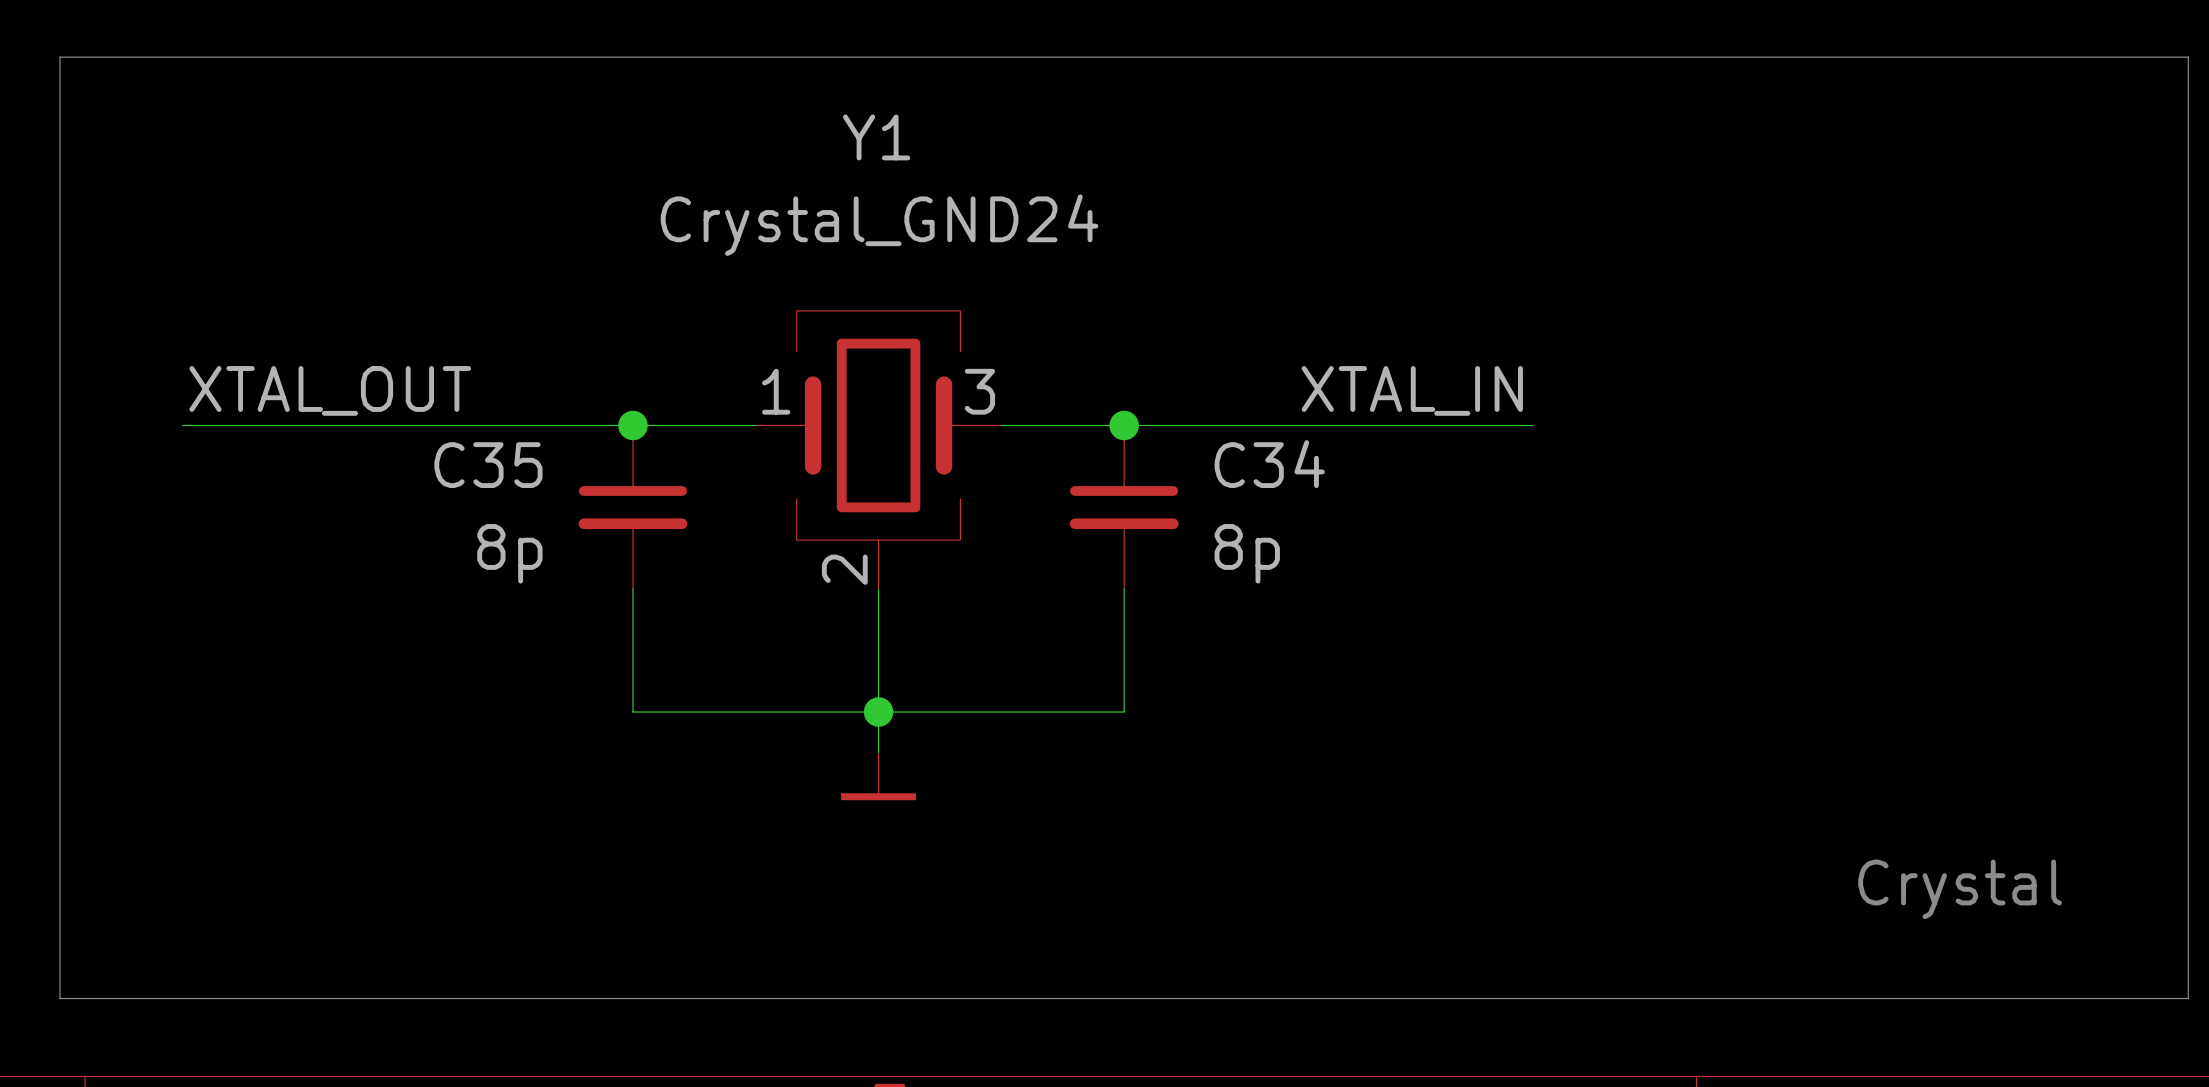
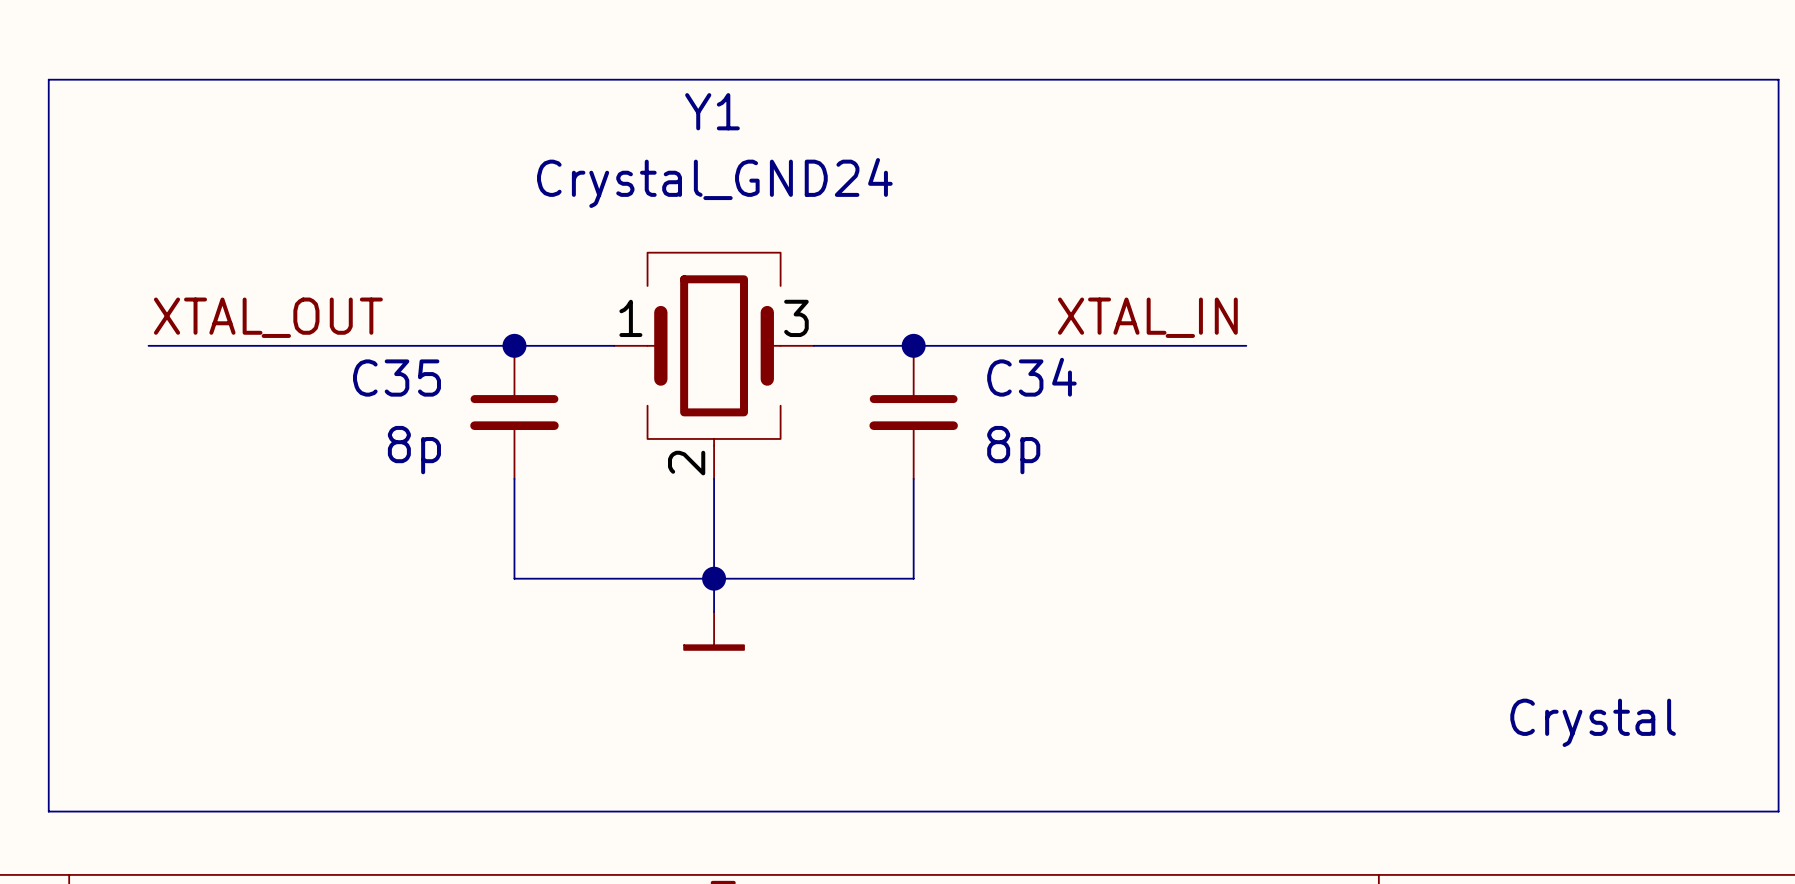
line: (59, 98) (59, 57) (2188, 57) (2188, 98) -> (48, 79) (1778, 79)

